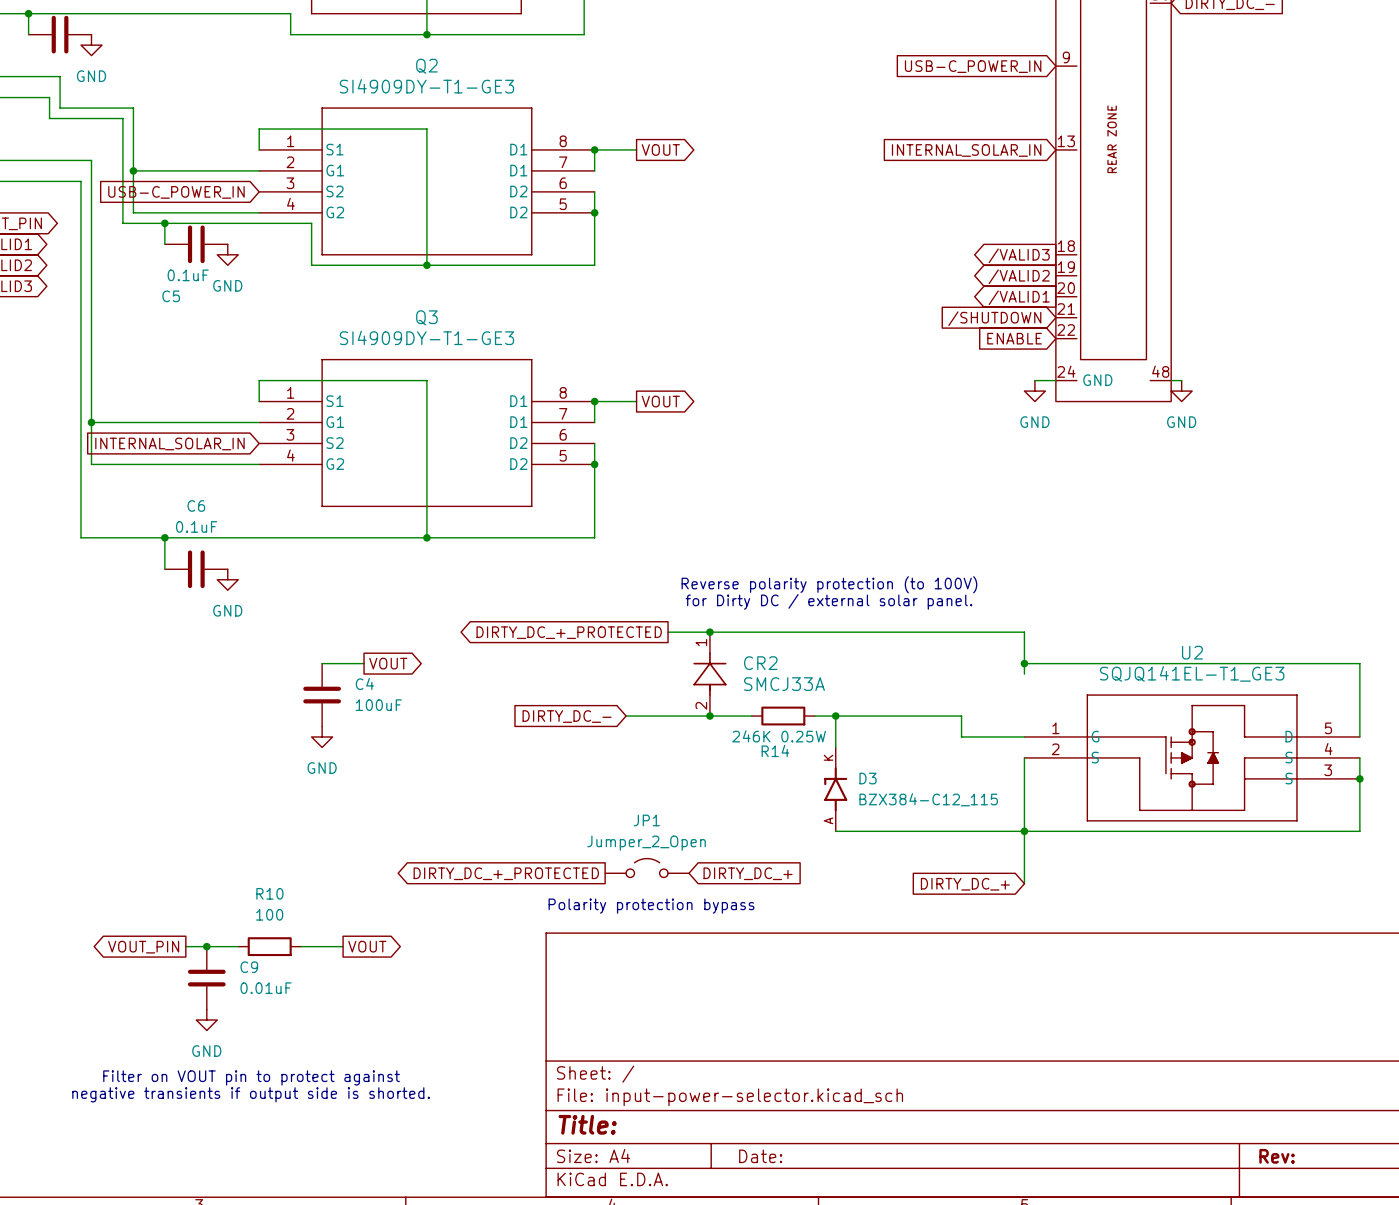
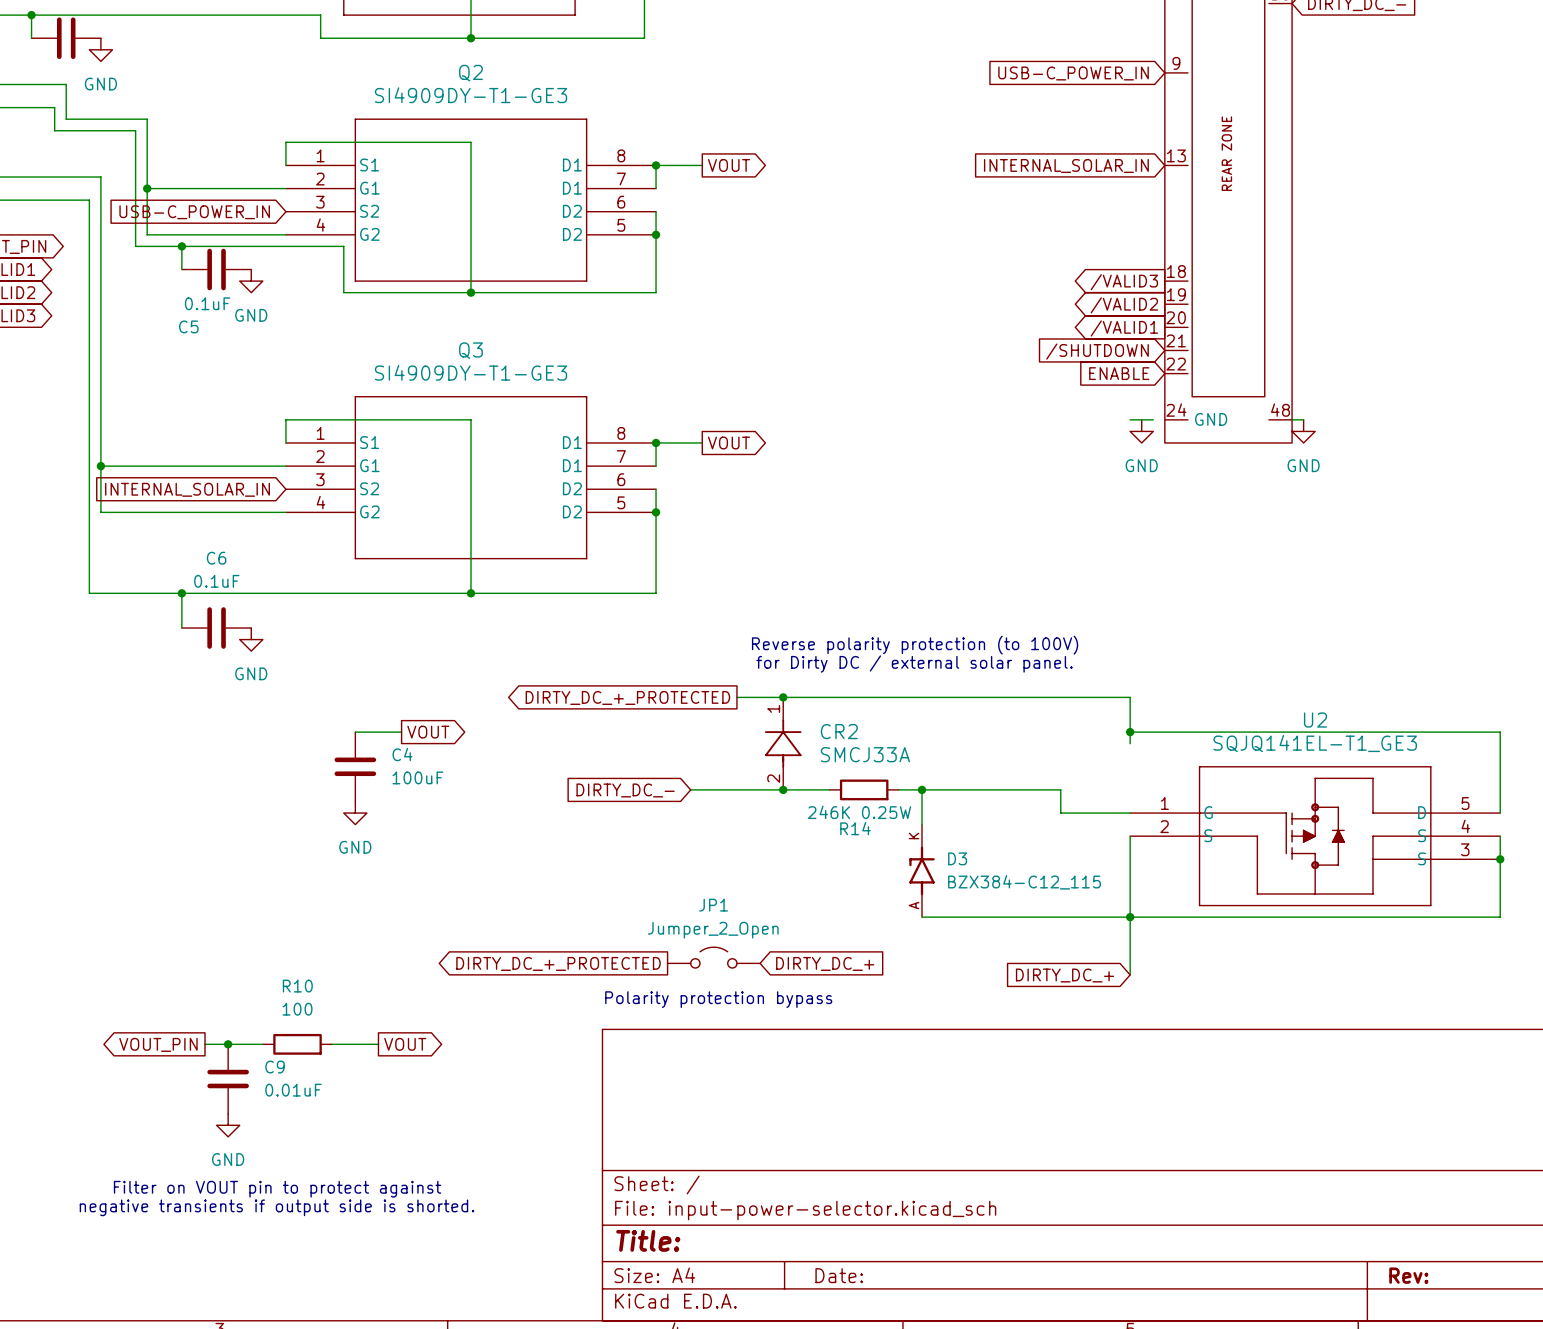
wire: (1045, 380) (1055, 380) -> (1130, 419) (1141, 419)

